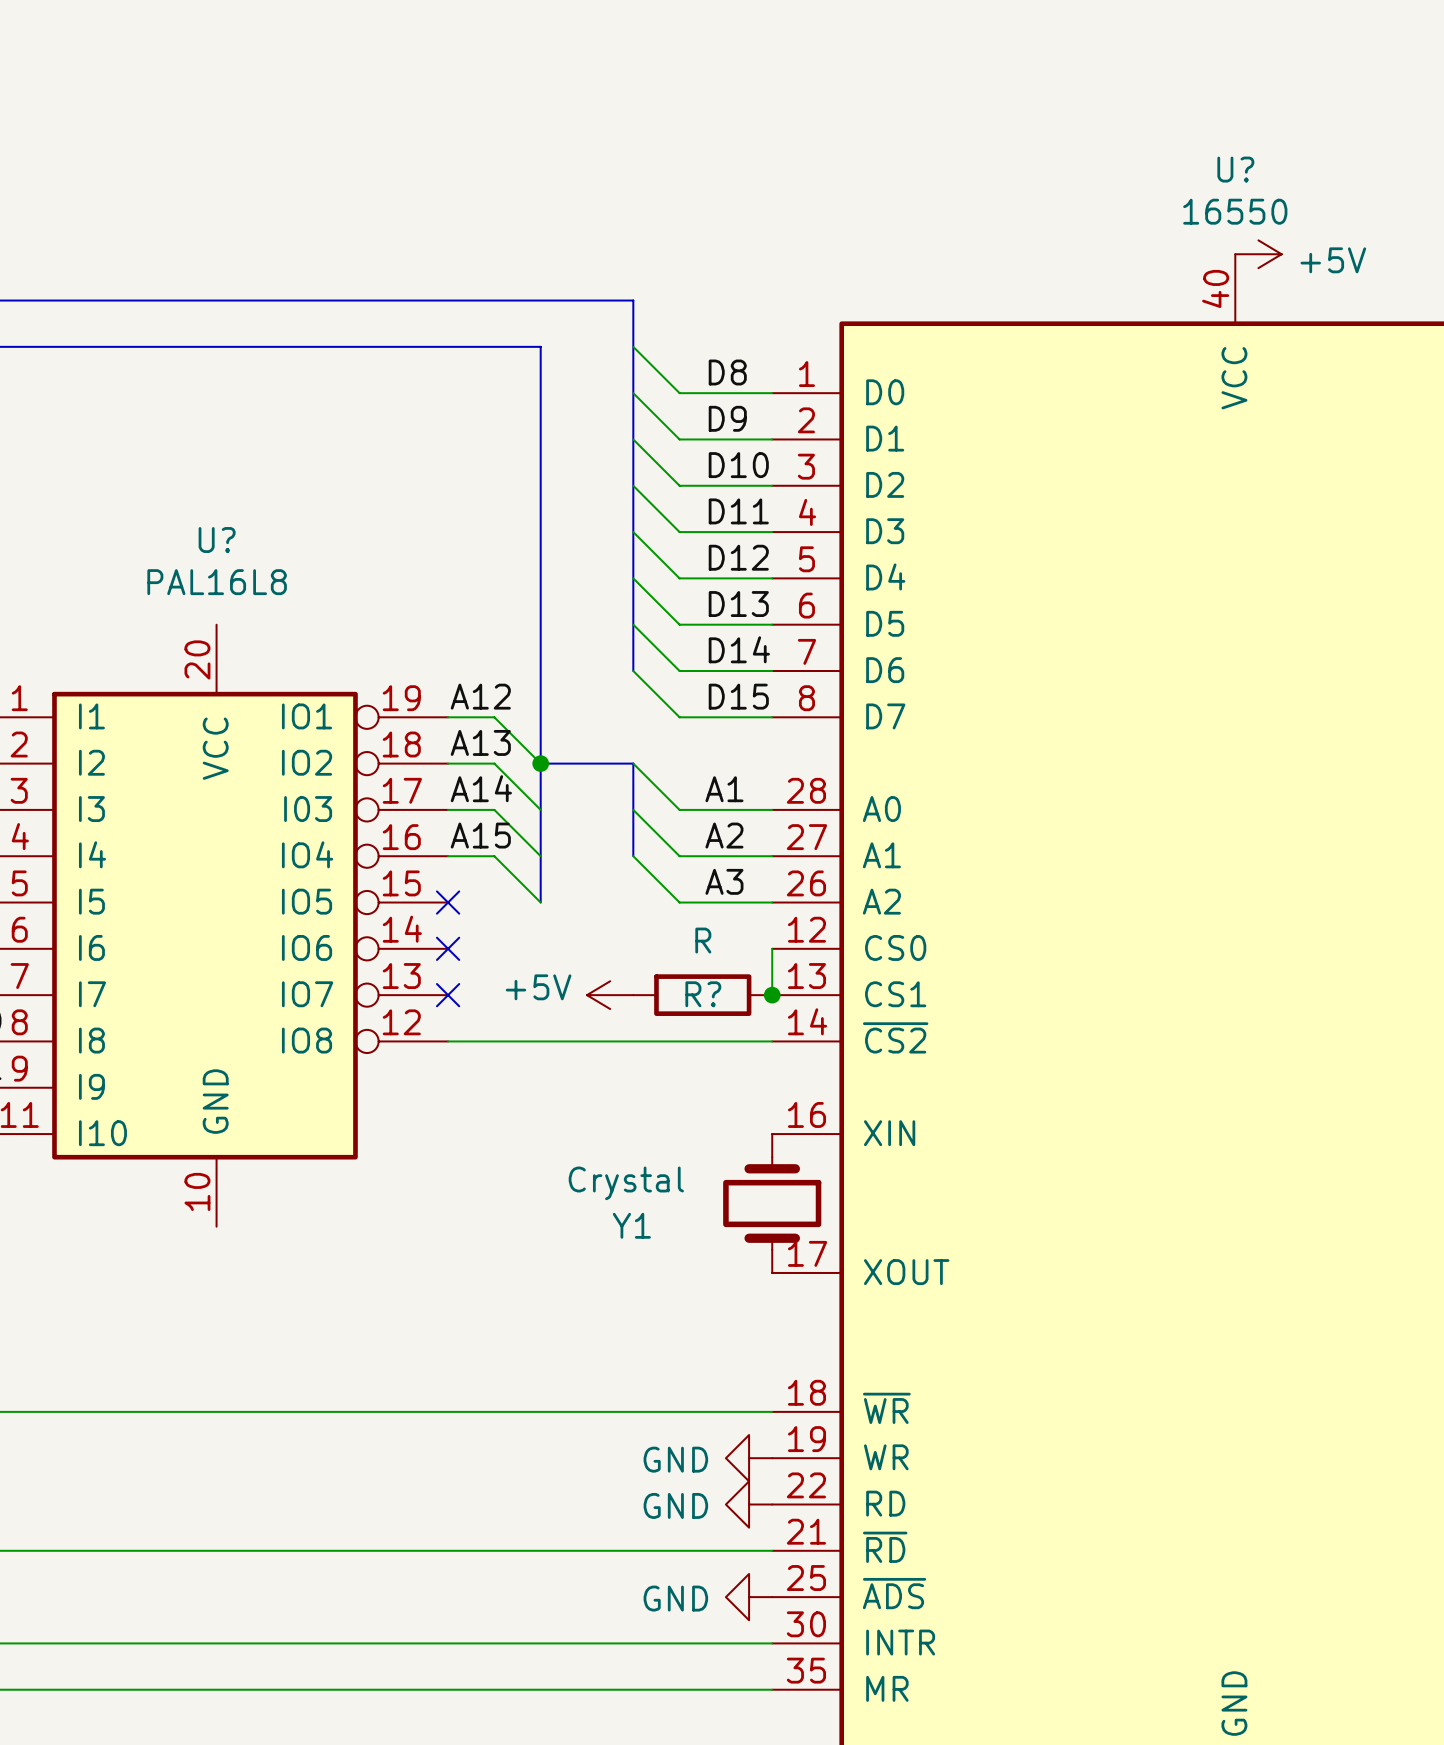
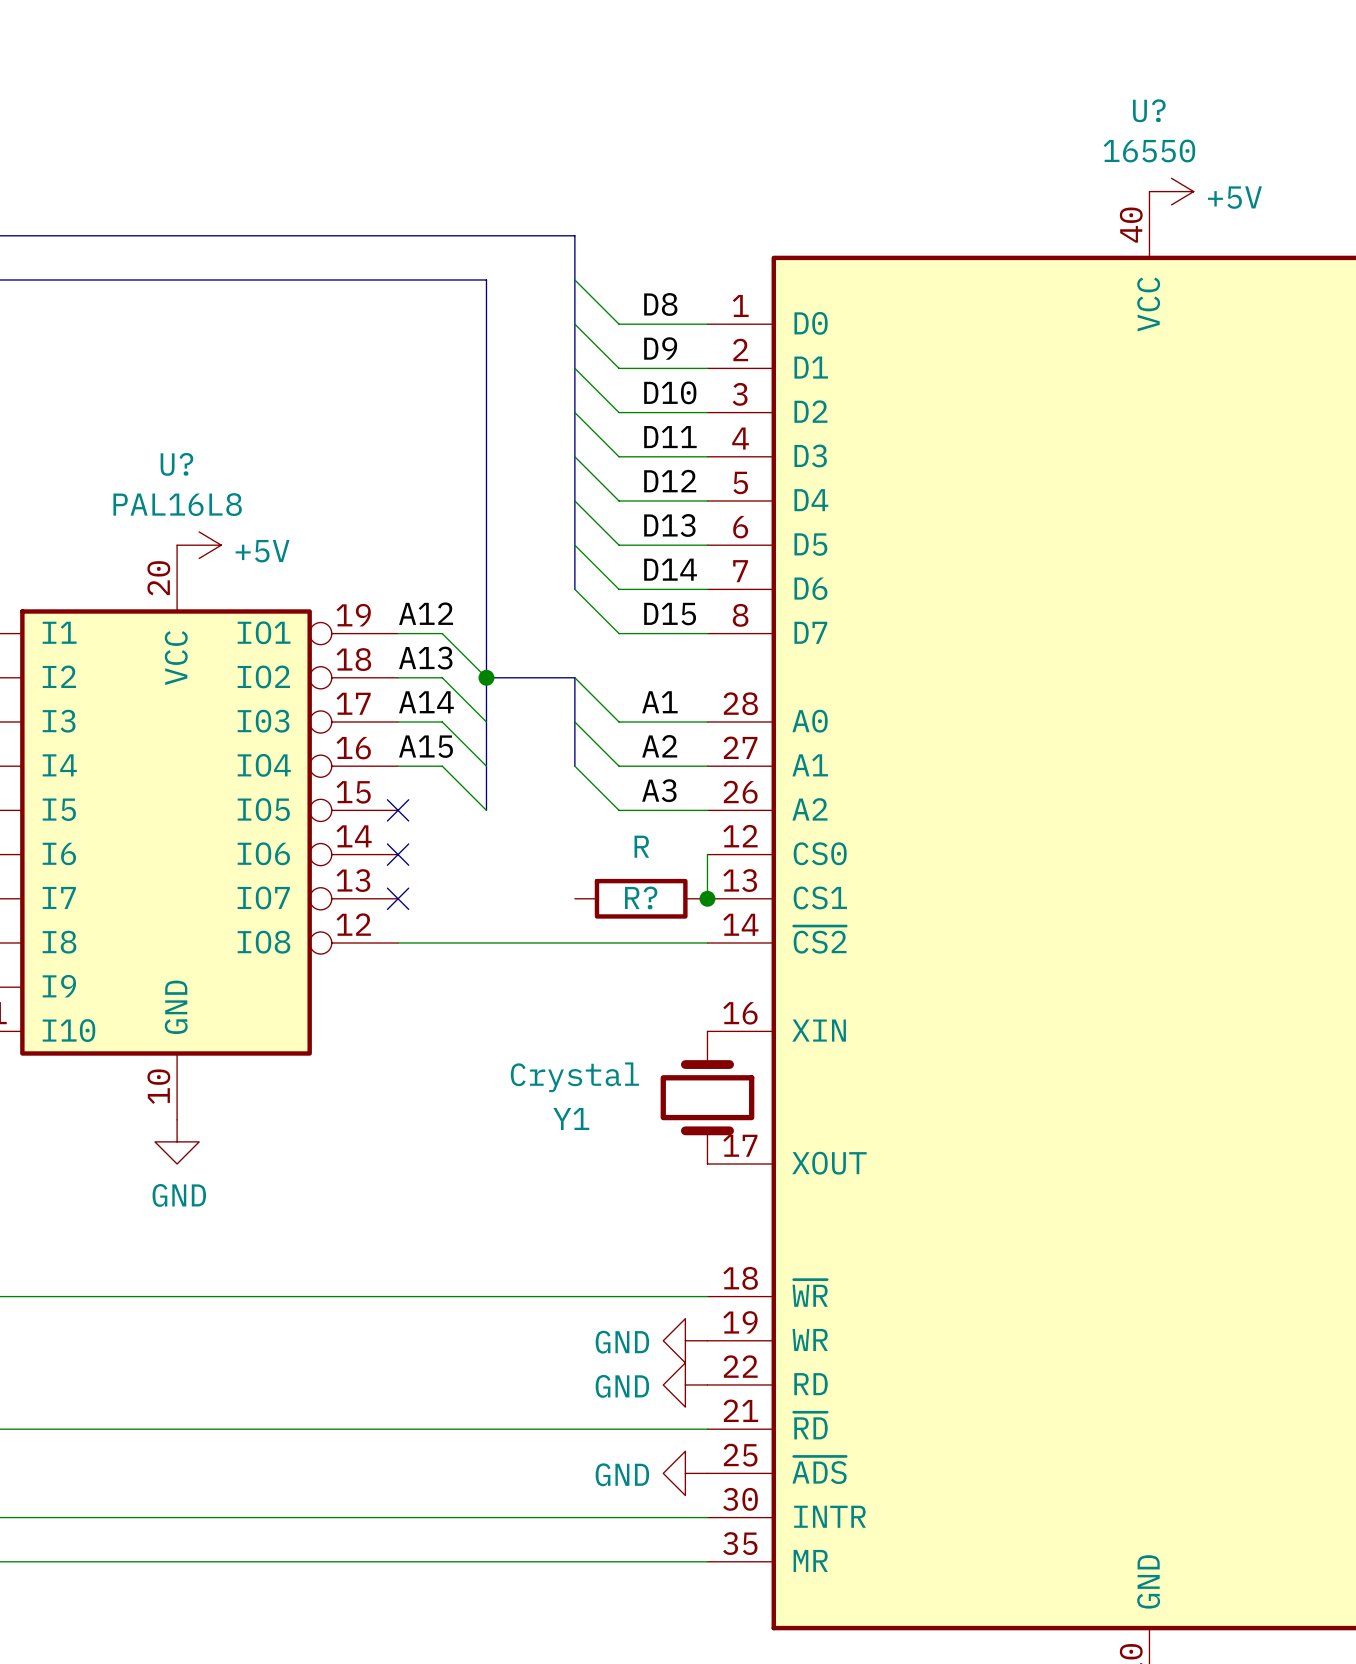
power symbol: none -> +5V (199, 545)
power symbol: +5V (610, 995) -> none
power symbol: none -> GND (177, 1141)

